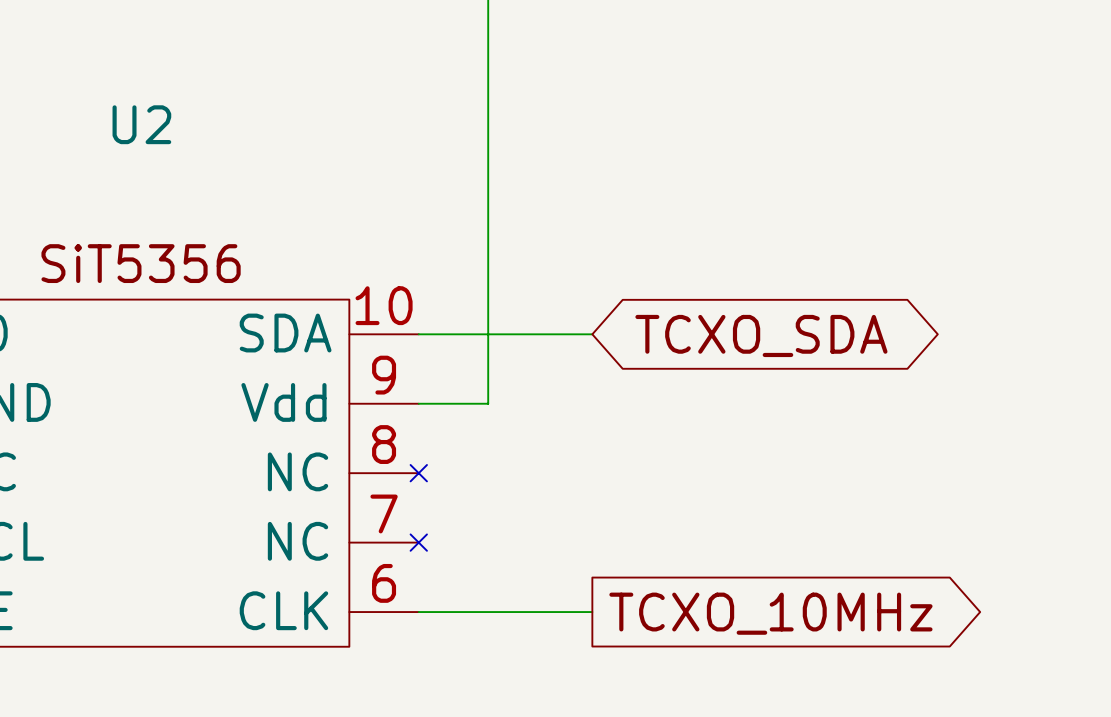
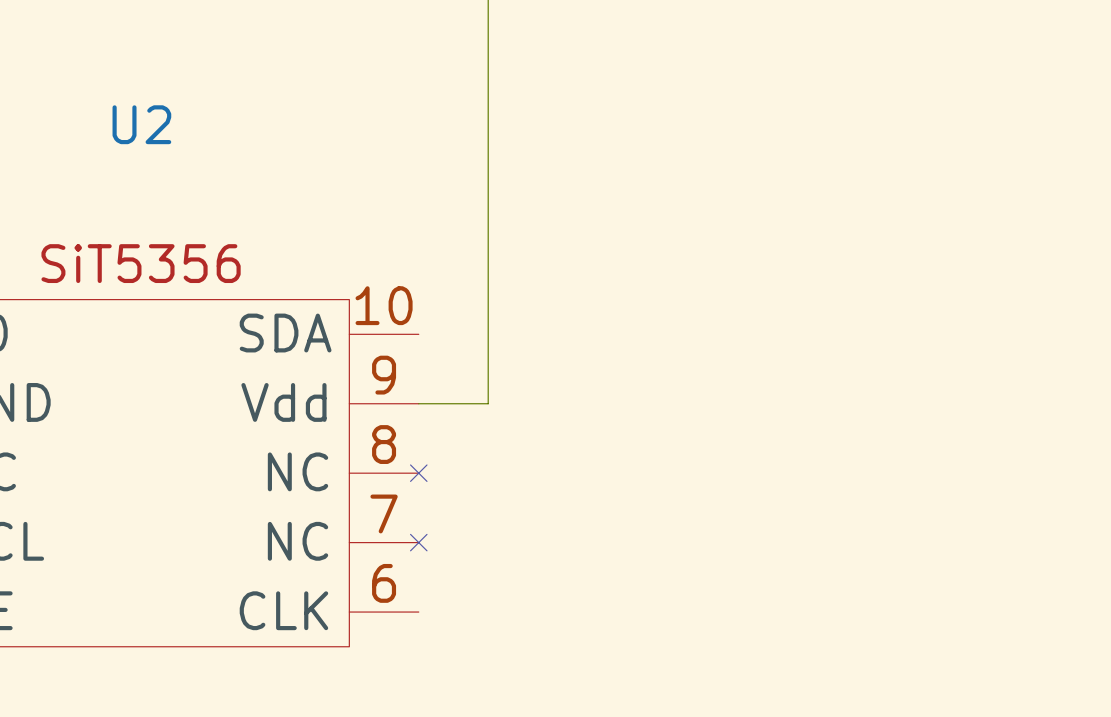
wire: (418, 334) (592, 334) -> none
global label: TCXO_SDA (761, 335) -> none
wire: (418, 612) (592, 612) -> none
global label: TCXO_10MHz (770, 613) -> none

